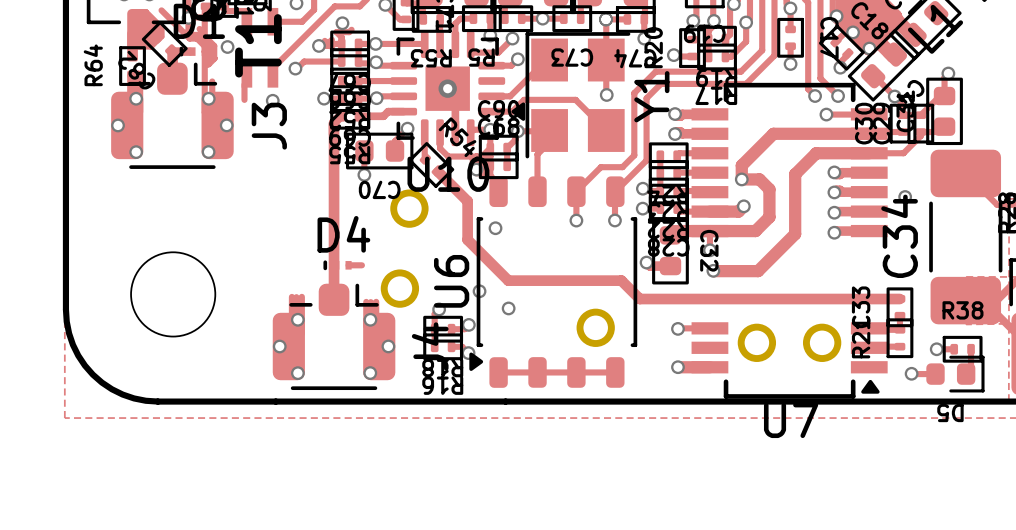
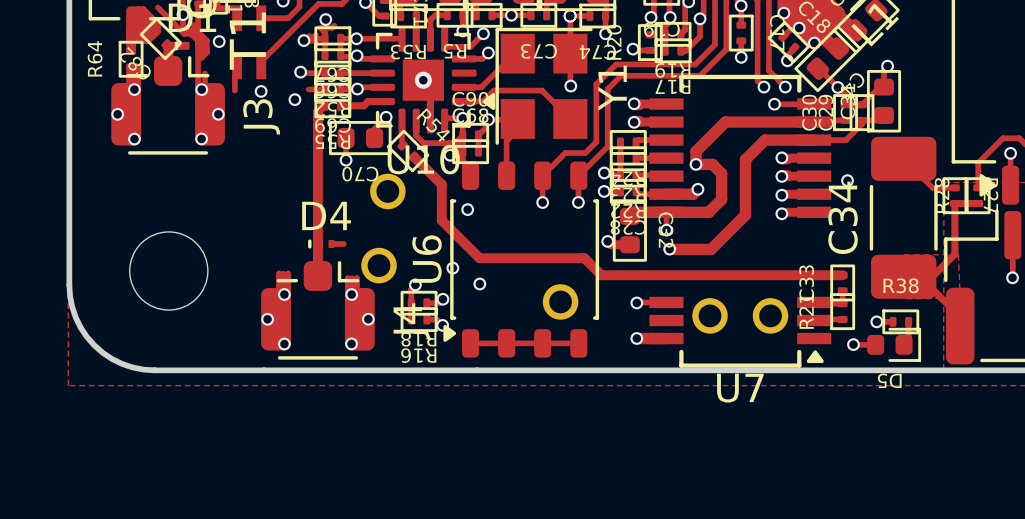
track: (341, 61) (304, 61) (295, 68) -> none
via: (295, 68) -> none
via: none -> (300, 72)
track: none -> (300, 73) (325, 73)
via: (324, 98) -> none
via: none -> (294, 99)

